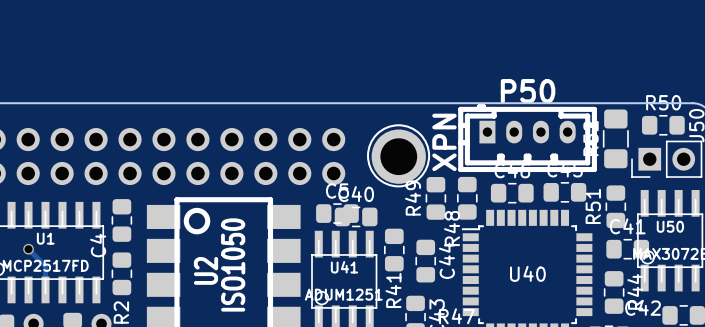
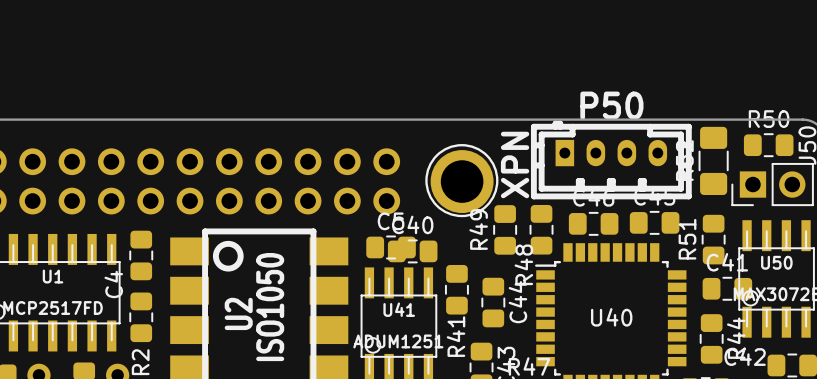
track: (28, 249) (45, 266) (45, 289) -> none
via: (28, 249) -> none

